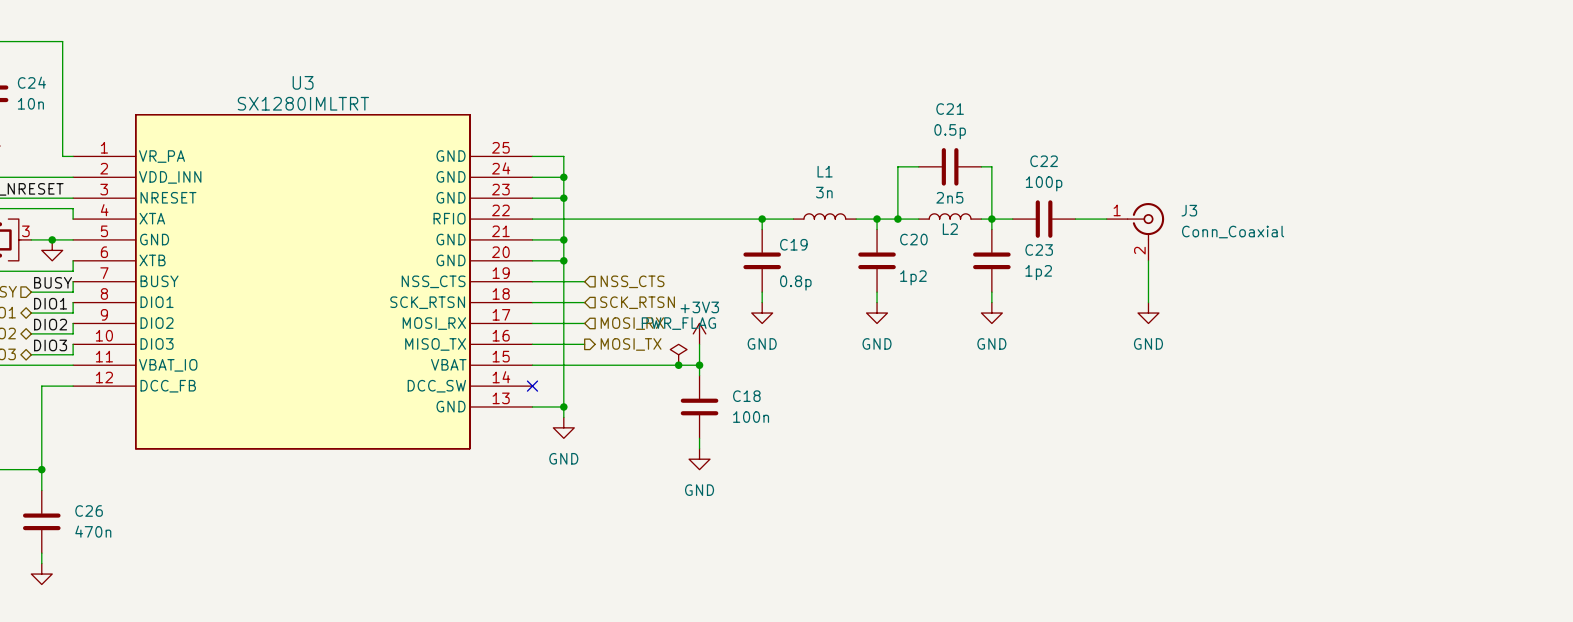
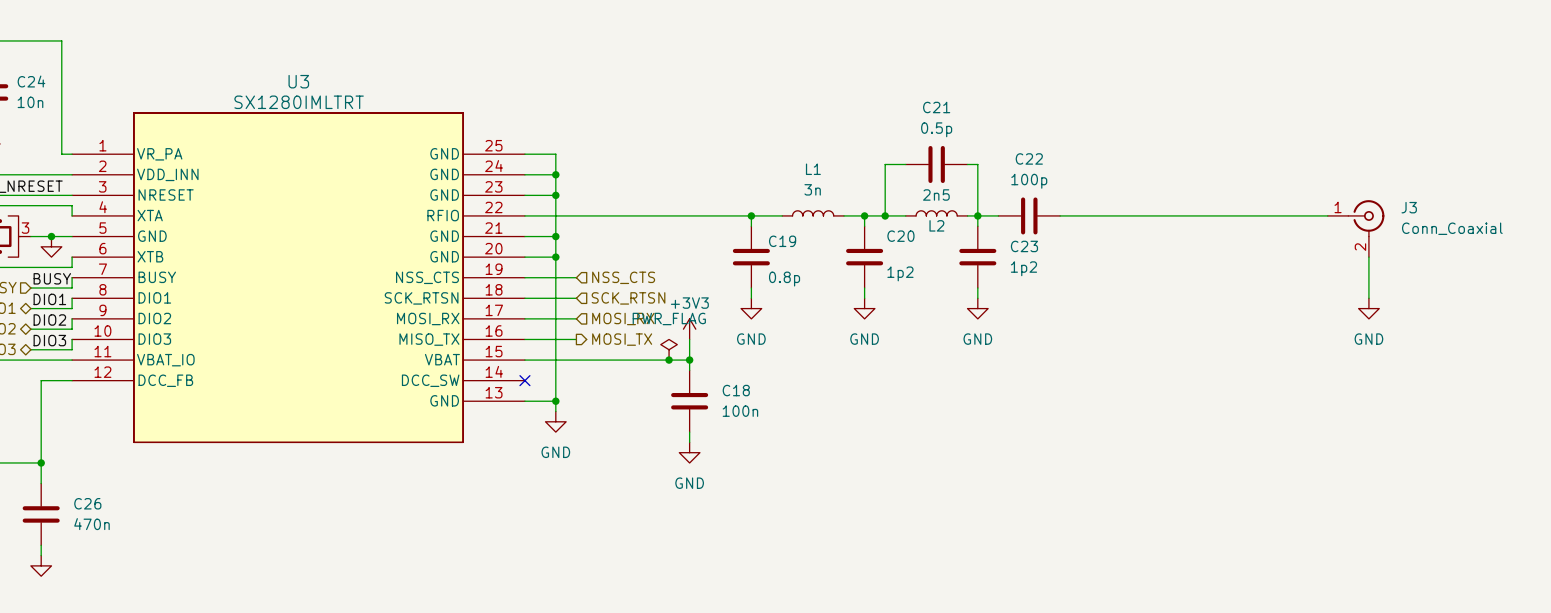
wire: none -> (1091, 215) (1327, 215)
J3 position: (1135, 231) -> (1356, 228)
wire: (1148, 260) (1148, 302) -> none
wire: none -> (1368, 257) (1368, 298)
power symbol: GND (1148, 313) -> none
power symbol: none -> GND (1368, 308)

